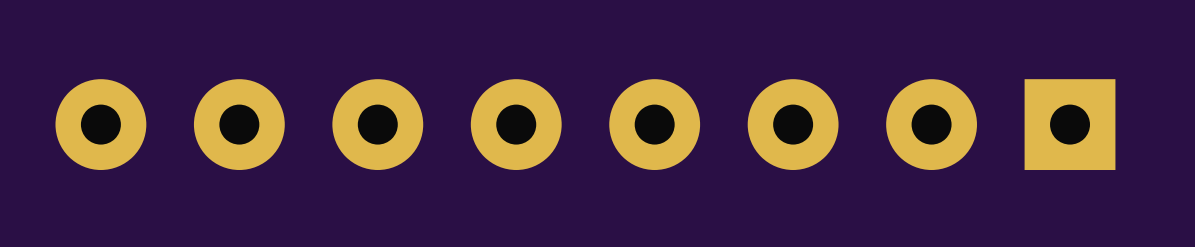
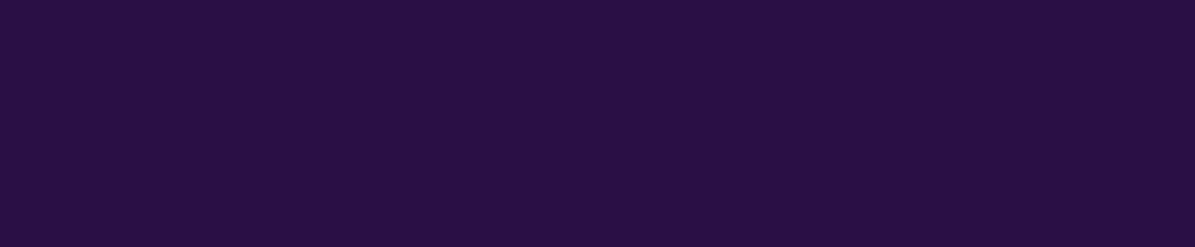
part: (585, 124) -> none

